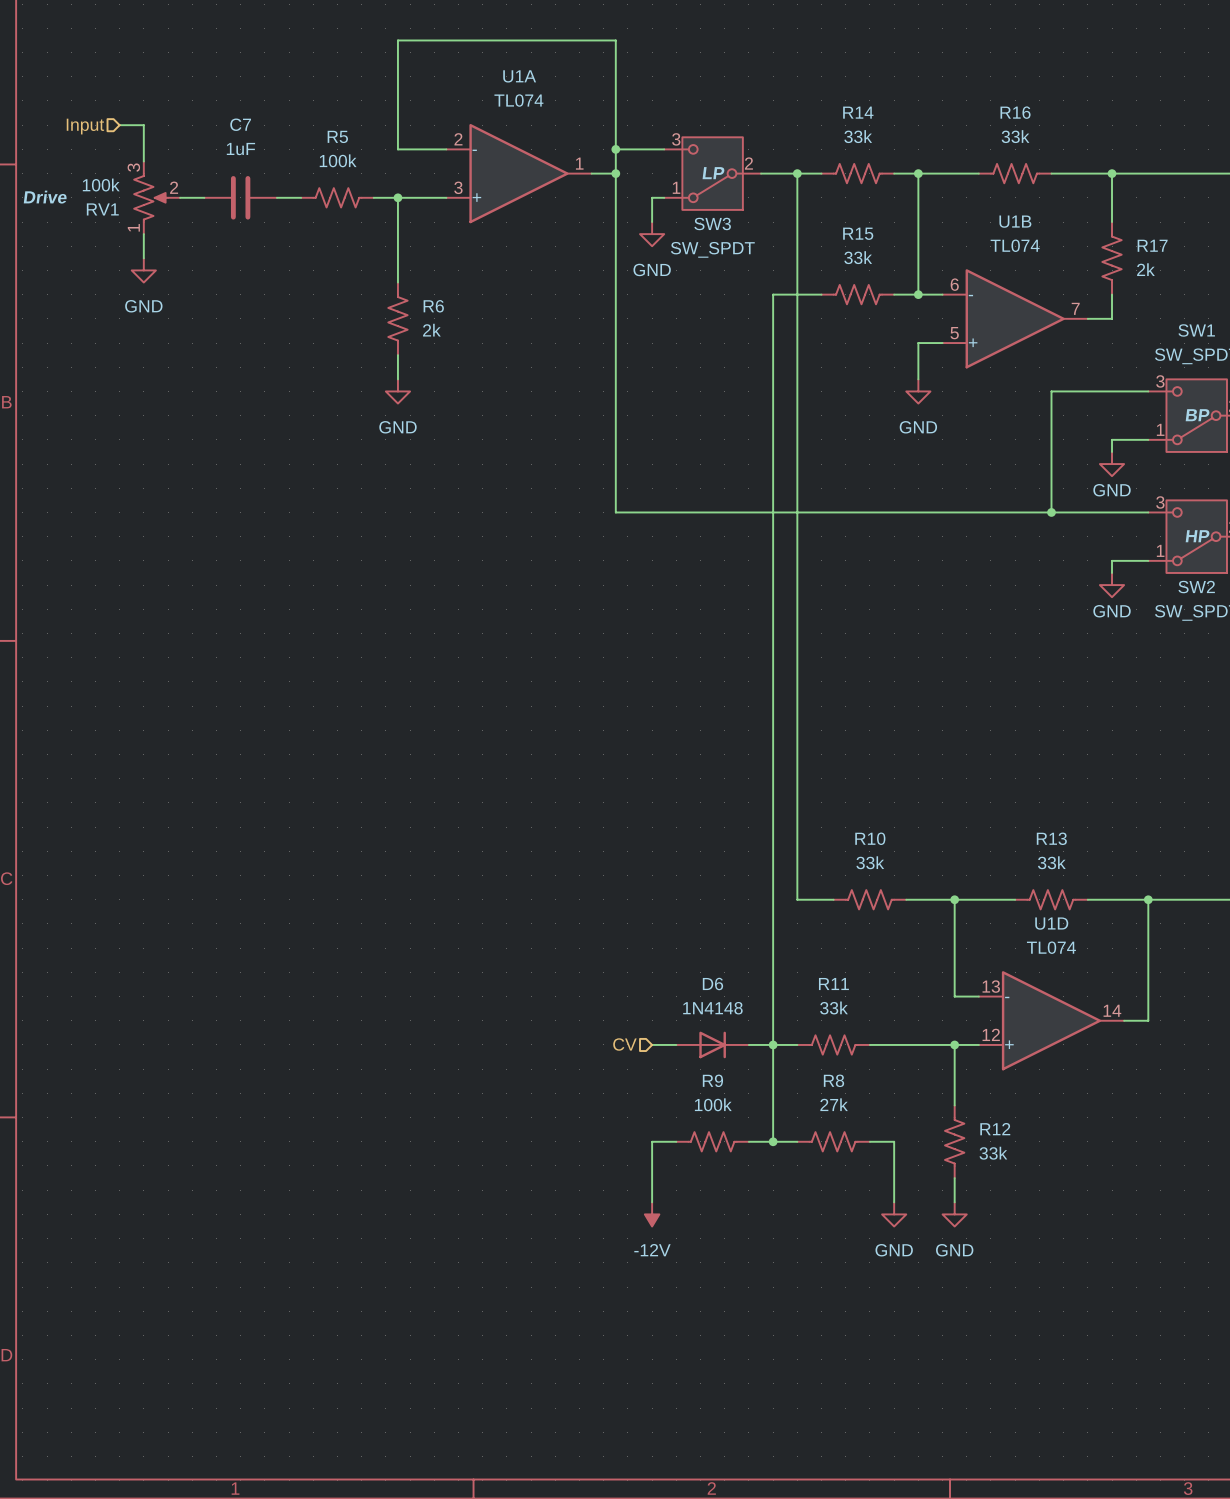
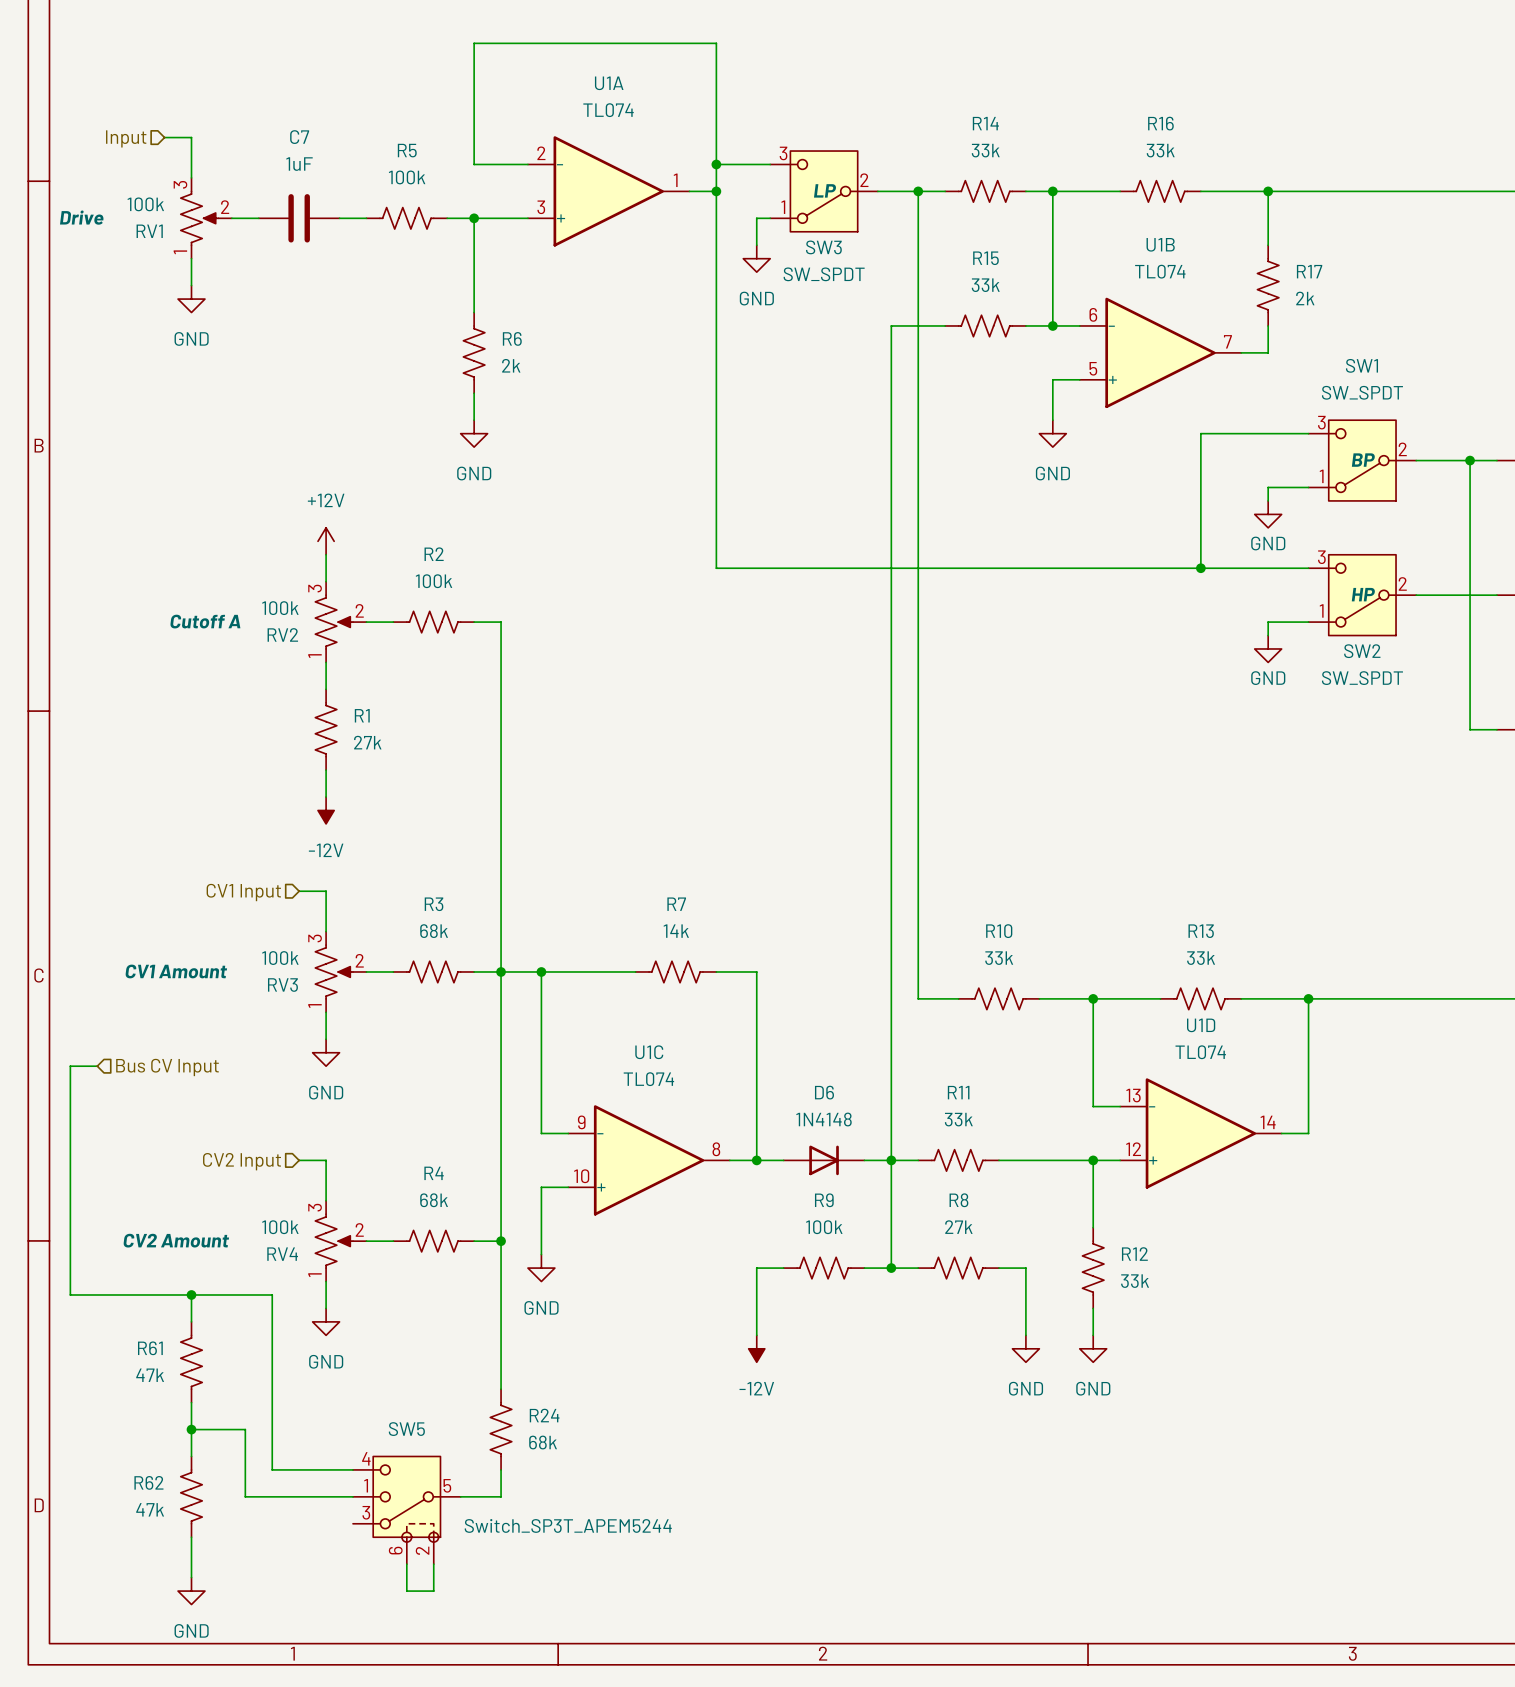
power symbol: none -> +12V (326, 541)
wire: none -> (326, 554) (326, 581)
RV2: none -> 100k (340, 622)
wire: none -> (366, 622) (393, 622)
R2: none -> 100k (433, 622)
wire: none -> (474, 622) (501, 622) (501, 1389)
wire: none -> (326, 662) (326, 689)
R1: none -> 27k (326, 729)
wire: none -> (326, 770) (326, 797)
power symbol: none -> -12V (326, 810)
wire: none -> (299, 891) (326, 891) (326, 931)
hierarchical label: none -> CV1 Input (243, 892)
RV3: none -> 100k (340, 971)
wire: none -> (366, 971) (393, 971)
R3: none -> 68k (433, 971)
wire: none -> (474, 971) (635, 971)
junction: none -> (501, 971)
wire: none -> (541, 971) (541, 1133) (568, 1133)
junction: none -> (541, 971)
R7: none -> 14k (676, 971)
wire: none -> (716, 971) (756, 971) (756, 1160) (729, 1160)
wire: none -> (326, 1012) (326, 1039)
power symbol: none -> GND (326, 1052)
wire: none -> (97, 1066) (70, 1066) (70, 1294) (272, 1294) (272, 1469) (353, 1469)
hierarchical label: none -> Bus CV Input (167, 1067)
wire: none -> (299, 1160) (326, 1160) (326, 1200)
U1C: none -> TL074 (649, 1160)
hierarchical label: CV (624, 1044) -> none
junction: none -> (756, 1160)
hierarchical label: none -> CV2 Input (242, 1161)
wire: none -> (568, 1187) (541, 1187) (541, 1254)
RV4: none -> 100k (340, 1241)
wire: none -> (366, 1241) (393, 1241)
R4: none -> 68k (433, 1241)
wire: none -> (474, 1241) (501, 1241)
junction: none -> (501, 1241)
power symbol: none -> GND (541, 1268)
wire: none -> (326, 1281) (326, 1308)
wire: none -> (191, 1294) (191, 1321)
junction: none -> (191, 1294)
power symbol: none -> GND (326, 1321)
R61: none -> 47k (191, 1362)
wire: none -> (191, 1402) (191, 1456)
wire: none -> (191, 1429) (245, 1429) (245, 1496) (353, 1496)
junction: none -> (191, 1429)
R24: none -> 68k (501, 1429)
wire: none -> (501, 1469) (501, 1496) (460, 1496)
R62: none -> 47k (191, 1496)
SW5: none -> Switch_SP3T_APEM5244 (406, 1510)
wire: none -> (191, 1537) (191, 1577)
wire: none -> (406, 1564) (406, 1591) (433, 1591) (433, 1564)
power symbol: none -> GND (191, 1591)

